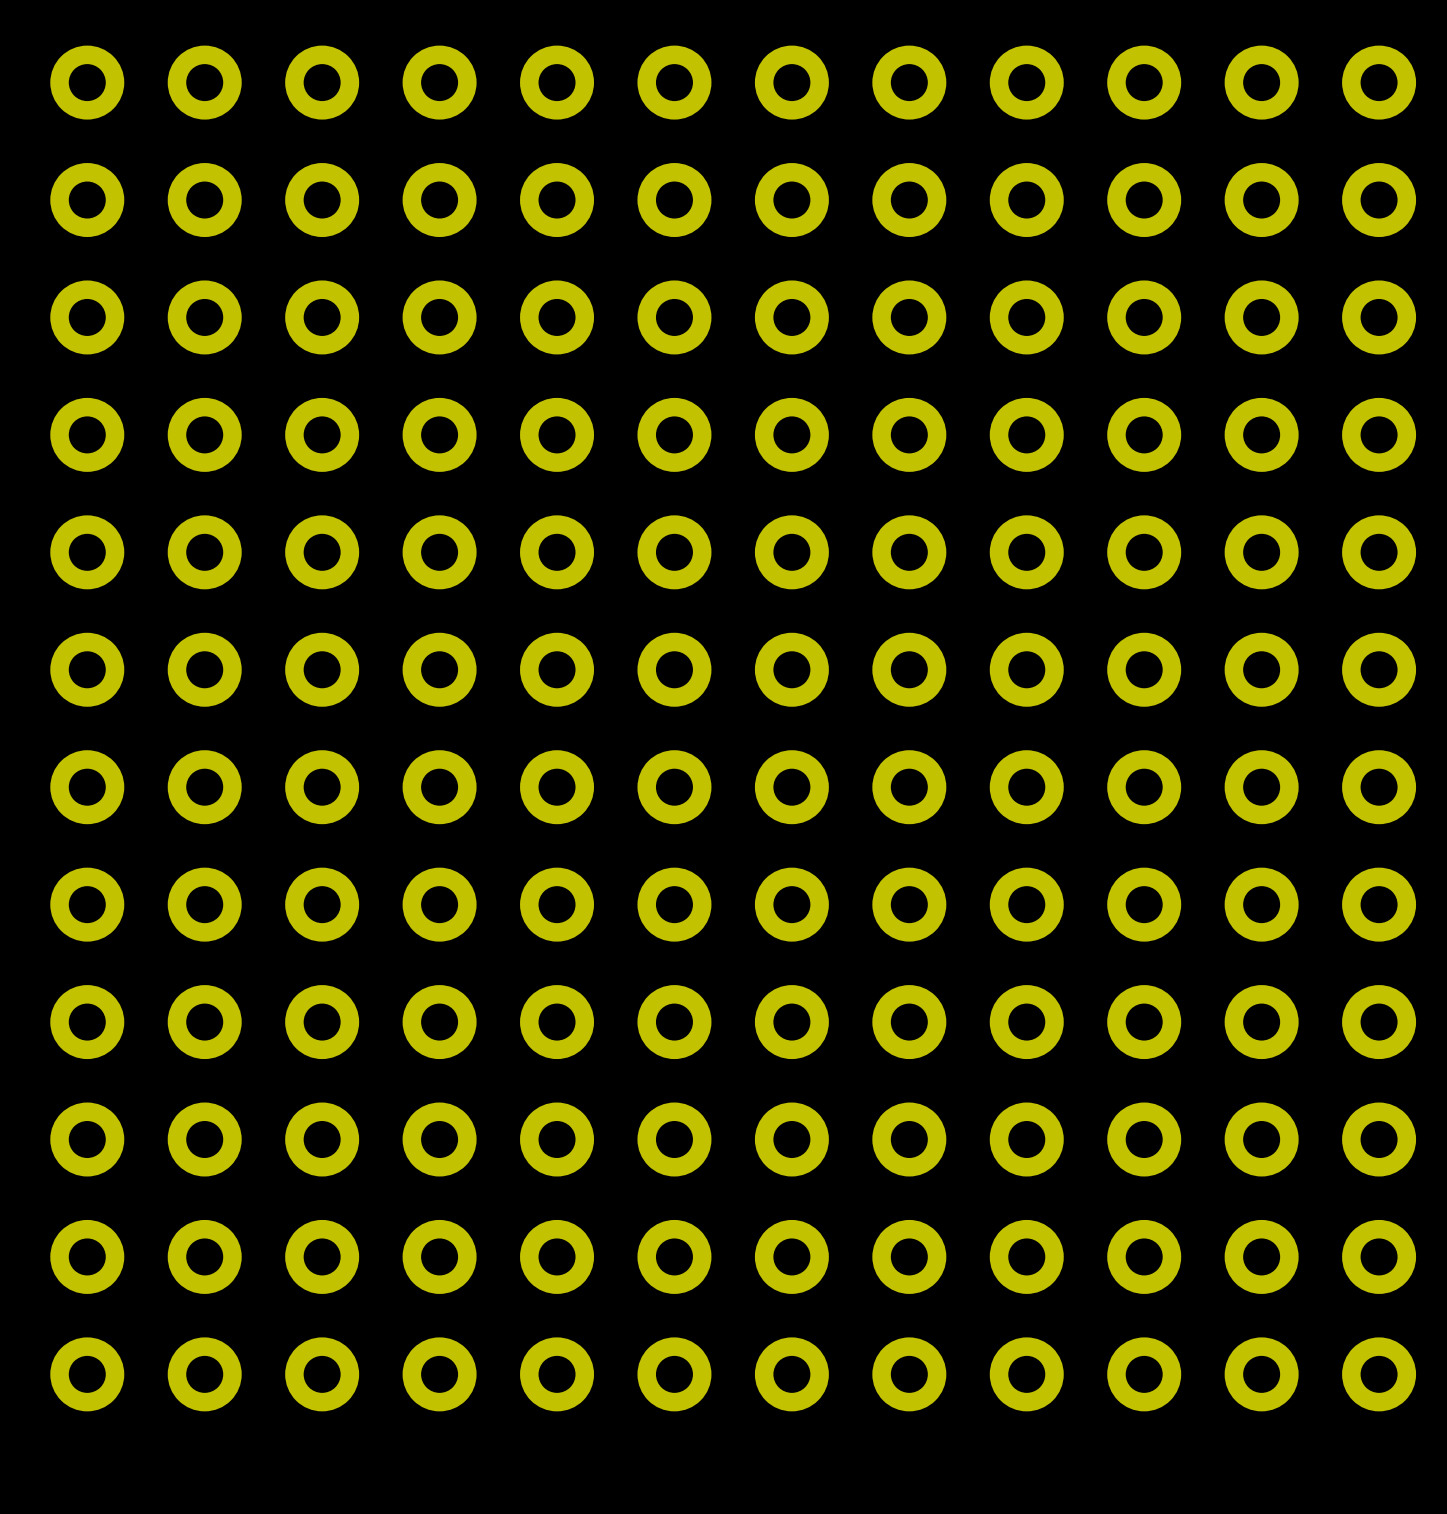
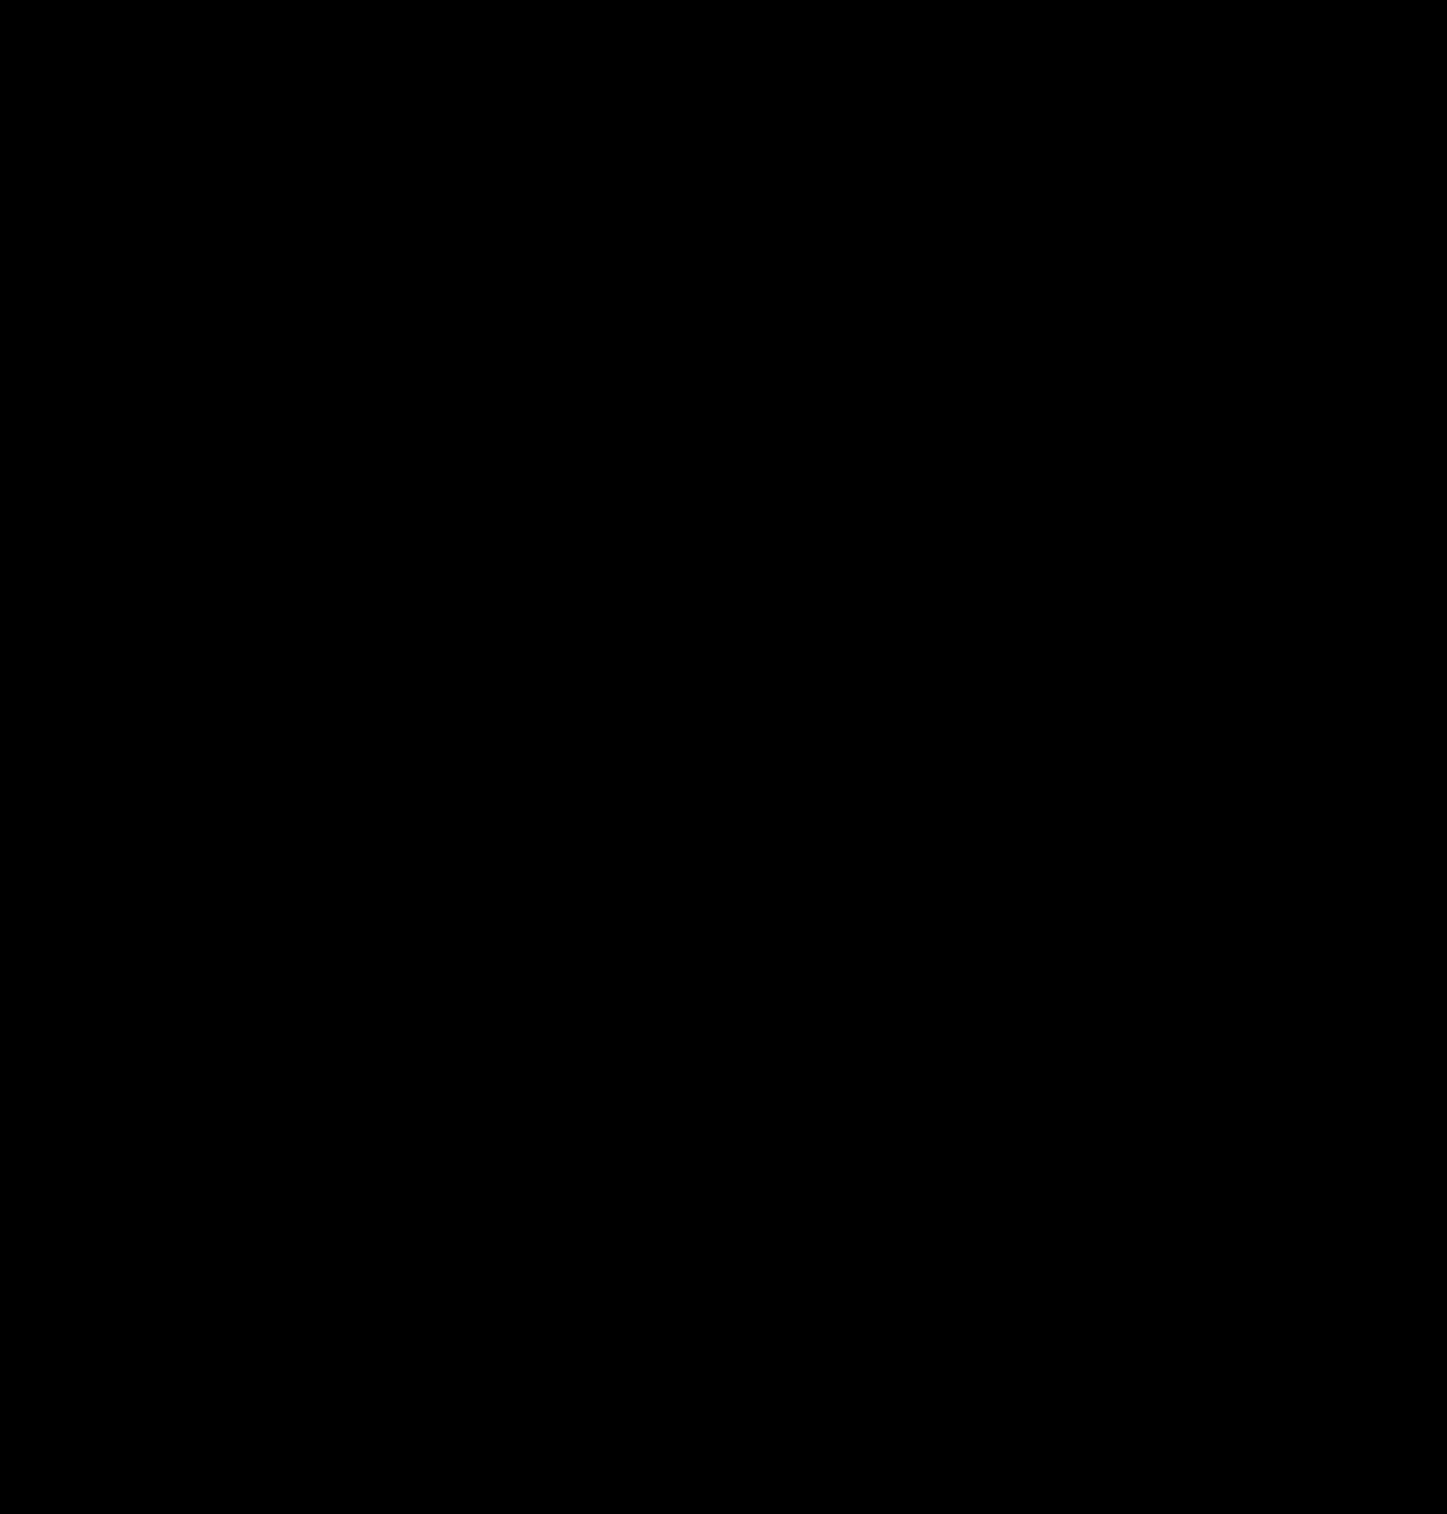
part: (733, 728) -> none

